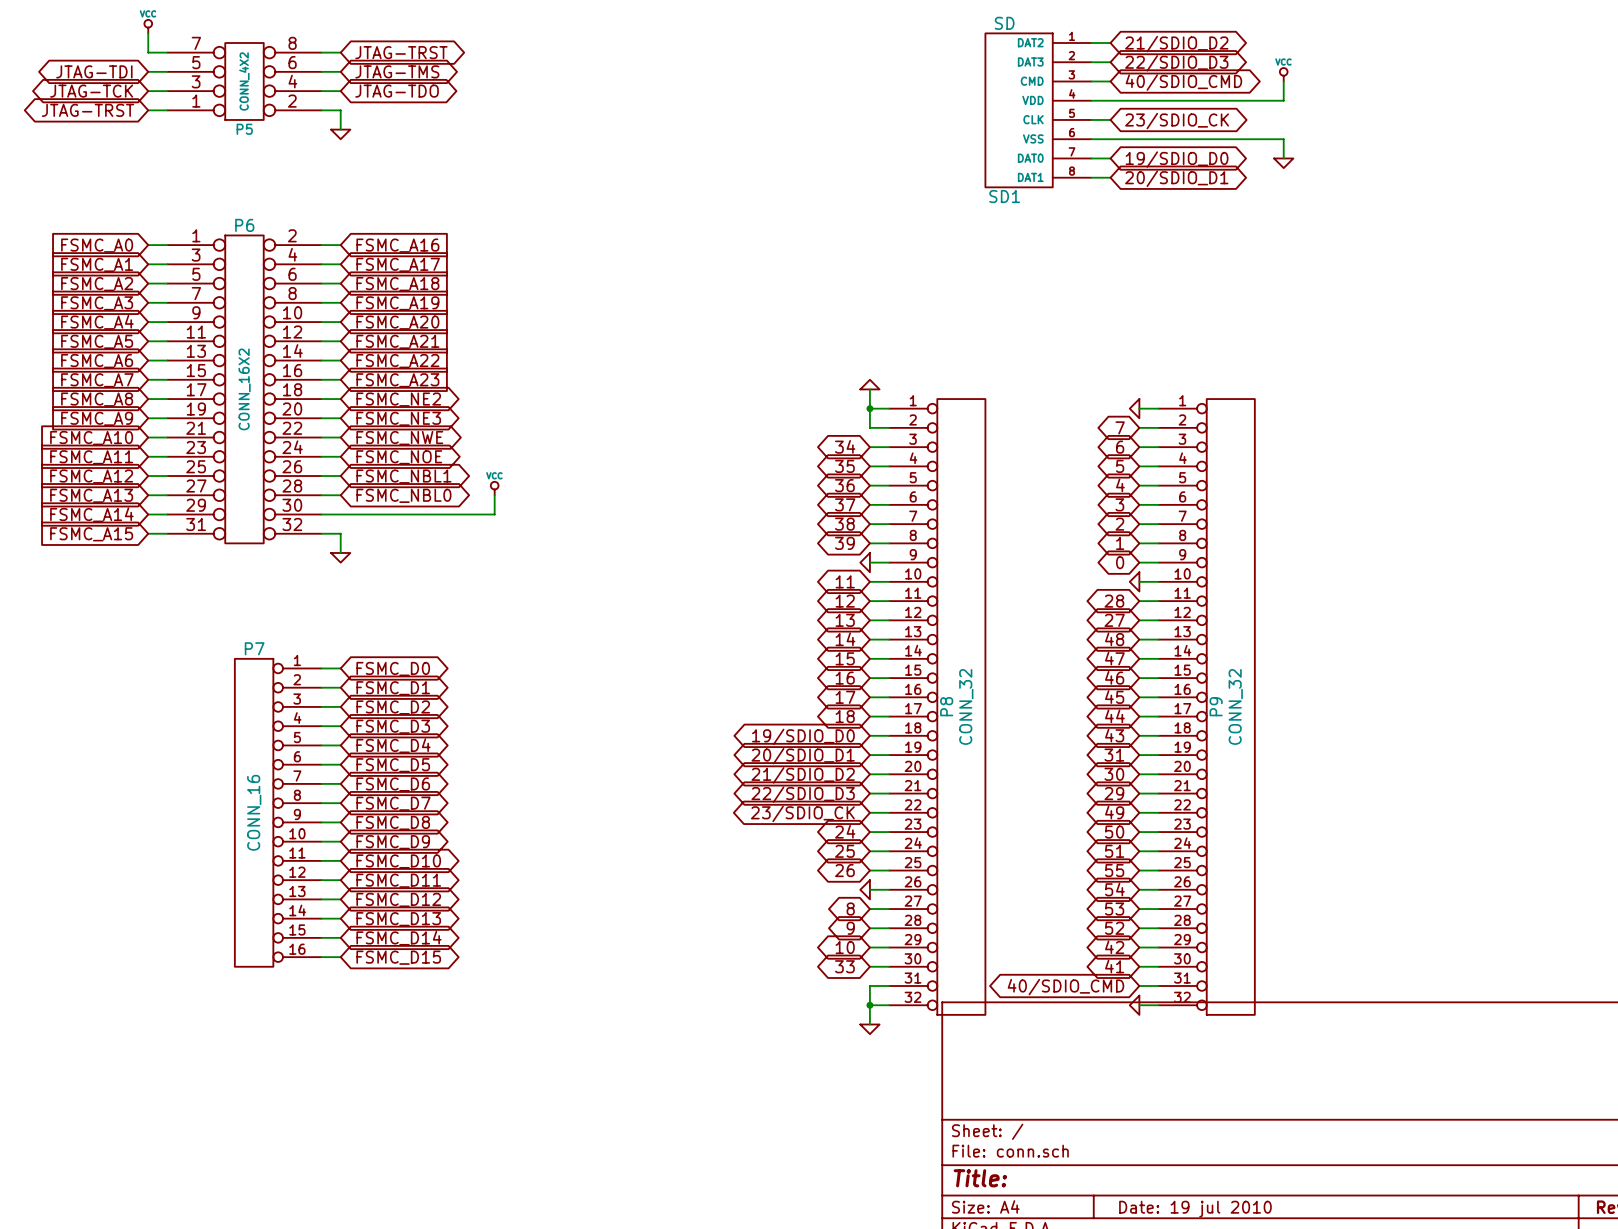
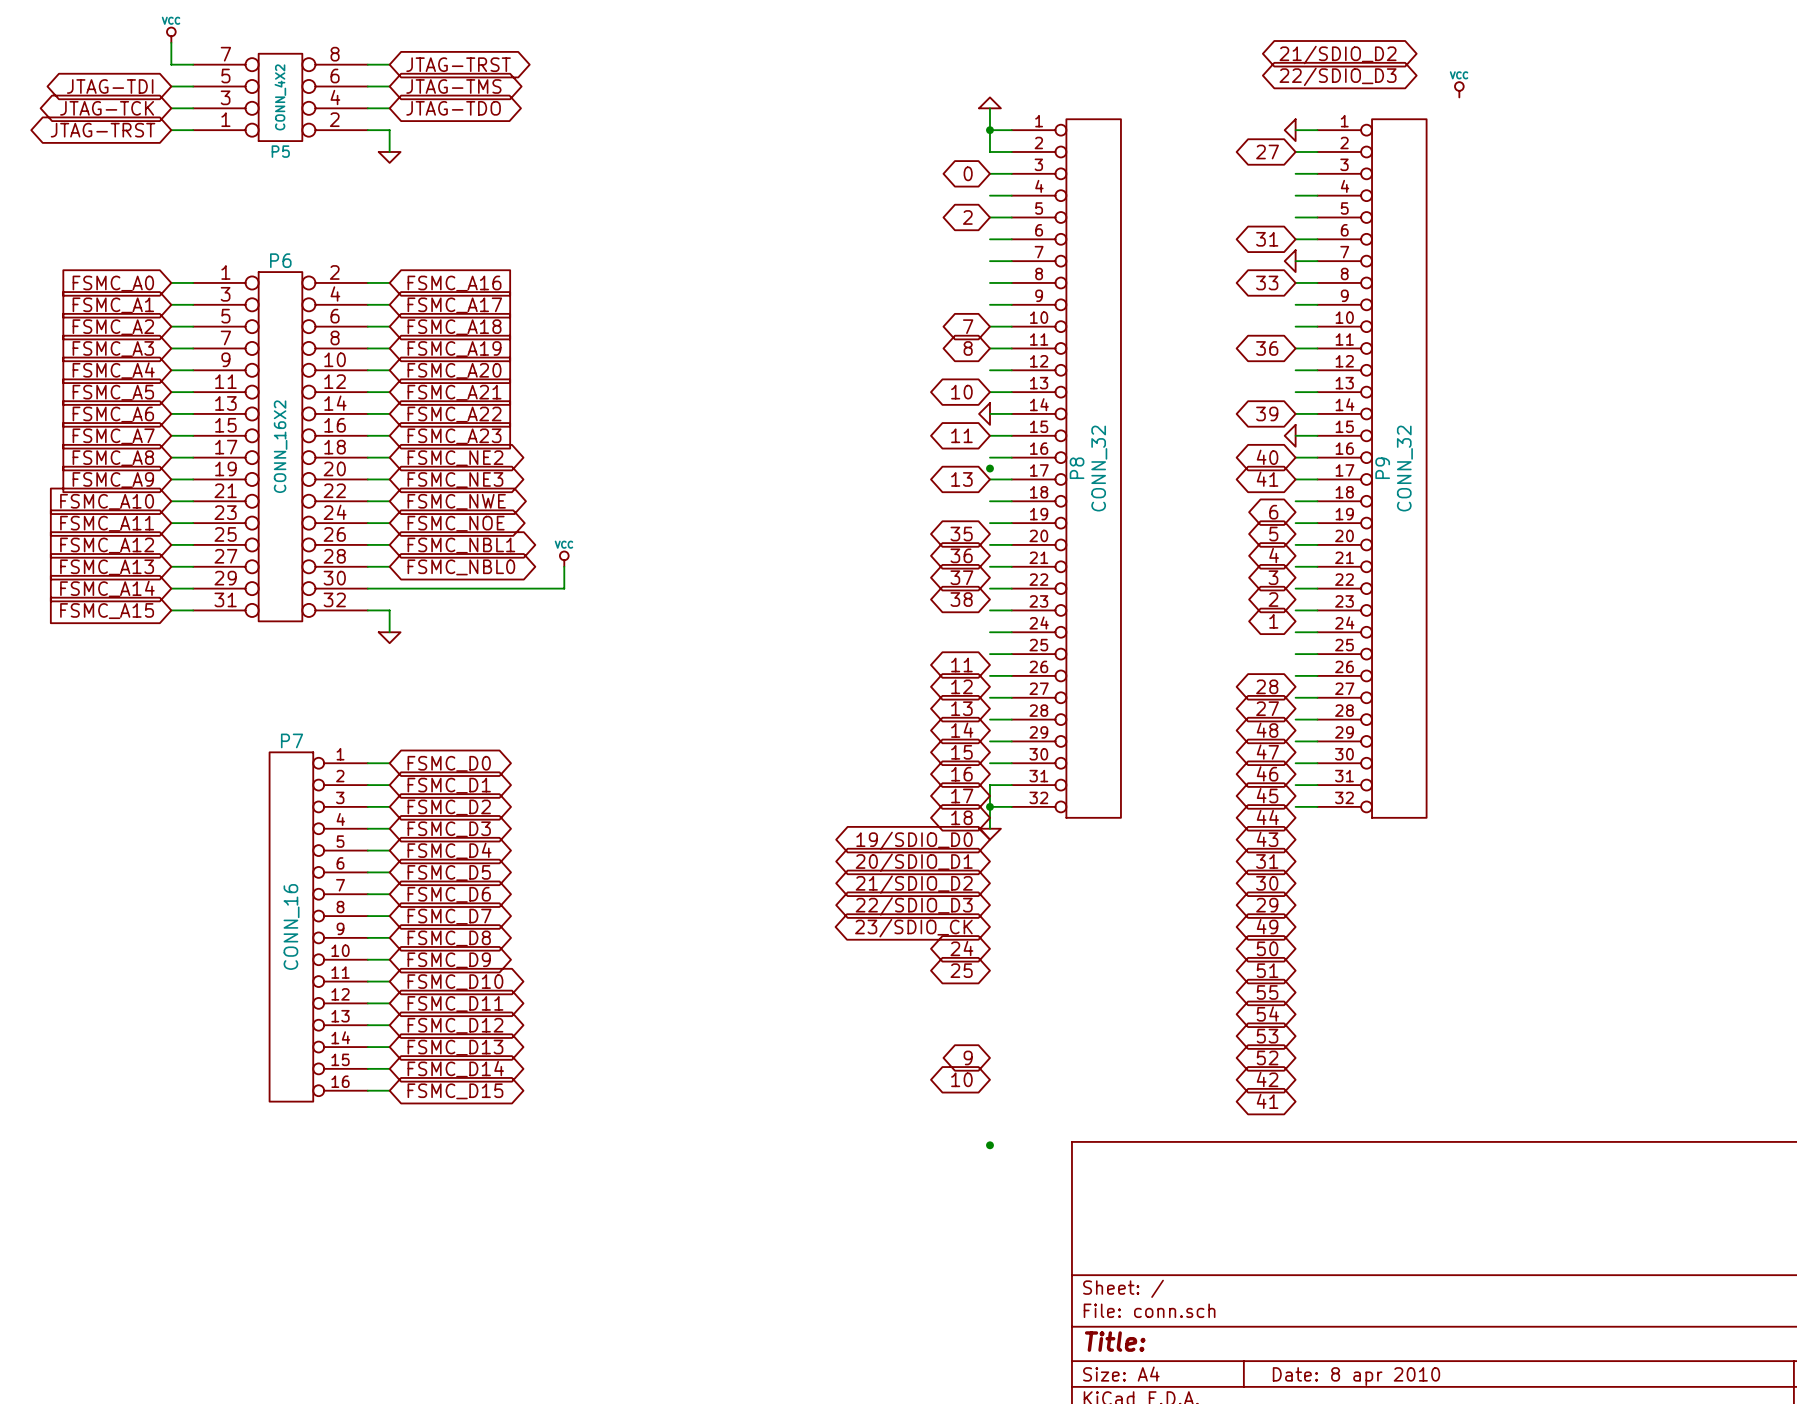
wire: (1091, 43) (1110, 43) -> (1295, 130) (1317, 130)
wire: (1091, 62) (1110, 62) -> (1295, 151) (1317, 151)
wire: (1091, 81) (1110, 81) -> (1295, 173) (1317, 173)
wire: (1283, 81) (1283, 100) (1091, 100) -> none
global label: 40/SDIO_CMD (1183, 82) -> none
power symbol: none -> (989, 102)
wire: none -> (989, 108) (989, 151) (1011, 151)
wire: none -> (989, 130) (1011, 130)
junction: none -> (989, 130)
SD1: SD (1038, 110) -> none
power symbol: none -> (1290, 130)
wire: (1091, 119) (1110, 119) -> (1295, 217) (1317, 217)
global label: 23/SDIO_CK (1177, 121) -> none
global label: none -> 27 (1267, 151)
wire: (1091, 139) (1283, 139) (1283, 158) -> none
global label: none -> 0 (968, 173)
wire: none -> (989, 173) (1011, 173)
wire: (1091, 158) (1110, 158) -> (1295, 239) (1317, 239)
global label: 19/SDIO_D0 (1177, 159) -> none
power symbol: (1283, 163) -> none
wire: none -> (989, 195) (1011, 195)
wire: (1091, 177) (1110, 177) -> (1295, 195) (1317, 195)
global label: 20/SDIO_D1 (1176, 178) -> none
global label: none -> 2 (967, 217)
wire: none -> (989, 217) (1011, 217)
wire: none -> (989, 239) (1011, 239)
global label: none -> 31 (1267, 239)
power symbol: none -> (1290, 261)
wire: none -> (989, 282) (1011, 282)
global label: none -> 33 (1267, 282)
global label: none -> 7 (968, 326)
global label: none -> 8 (968, 348)
global label: none -> 36 (1267, 348)
global label: none -> 10 (961, 392)
global label: none -> 39 (1267, 413)
global label: none -> 11 (961, 435)
power symbol rotation: 0° (869, 384) -> 90° counterclockwise (984, 413)
power symbol position: (869, 384) -> (984, 413)
wire: (869, 389) (869, 427) (889, 427) -> none
global label: none -> 40 (1267, 457)
wire: (869, 408) (889, 408) -> (989, 261) (1011, 261)
power symbol position: (1134, 408) -> (1290, 435)
wire: (1139, 408) (1158, 408) -> (1295, 261) (1317, 261)
global label: none -> 13 (961, 479)
global label: none -> 41 (1267, 479)
global label: 7 (1120, 427) -> none
wire: (1139, 427) (1158, 427) -> (1295, 282) (1317, 282)
global label: 34 (845, 446) -> none
wire: (869, 447) (889, 447) -> (989, 304) (1011, 304)
wire: (1139, 447) (1158, 447) -> (1295, 304) (1317, 304)
wire: (869, 466) (889, 466) -> (989, 326) (1011, 326)
wire: (1139, 466) (1158, 466) -> (1295, 326) (1317, 326)
wire: (869, 485) (889, 485) -> (989, 348) (1011, 348)
wire: (1139, 485) (1158, 485) -> (1295, 348) (1317, 348)
wire: (869, 504) (889, 504) -> (989, 370) (1011, 370)
wire: (1139, 504) (1158, 504) -> (1295, 370) (1317, 370)
wire: (869, 524) (889, 524) -> (989, 392) (1011, 392)
wire: (1139, 524) (1158, 524) -> (1295, 392) (1317, 392)
global label: 39 (844, 543) -> none
wire: (869, 543) (889, 543) -> (989, 413) (1011, 413)
wire: (1139, 543) (1158, 543) -> (1295, 413) (1317, 413)
power symbol: (865, 562) -> none
wire: (869, 562) (889, 562) -> (989, 435) (1011, 435)
global label: 0 (1120, 562) -> none
wire: (1139, 562) (1158, 562) -> (1295, 435) (1317, 435)
wire: (869, 581) (889, 581) -> (989, 457) (1011, 457)
power symbol: (1134, 581) -> none
wire: (1139, 581) (1158, 581) -> (1295, 457) (1317, 457)
wire: (869, 601) (889, 601) -> (989, 479) (1011, 479)
wire: (1139, 601) (1158, 601) -> (1295, 479) (1317, 479)
wire: (869, 620) (889, 620) -> (989, 501) (1011, 501)
wire: (1139, 620) (1158, 620) -> (1295, 501) (1317, 501)
wire: (869, 639) (889, 639) -> (989, 523) (1011, 523)
wire: (1139, 639) (1158, 639) -> (1295, 523) (1317, 523)
wire: (869, 658) (889, 658) -> (989, 544) (1011, 544)
wire: (1139, 658) (1158, 658) -> (1295, 544) (1317, 544)
wire: (869, 678) (889, 678) -> (989, 566) (1011, 566)
wire: (1139, 678) (1158, 678) -> (1295, 566) (1317, 566)
wire: none -> (1011, 785) (989, 785) (989, 828)
wire: (869, 697) (889, 697) -> (989, 588) (1011, 588)
wire: (1139, 697) (1158, 697) -> (1295, 588) (1317, 588)
junction: none -> (989, 806)
P8 position: (937, 706) -> (1066, 468)
P9 position: (1206, 706) -> (1372, 468)
wire: (869, 716) (889, 716) -> (989, 610) (1011, 610)
wire: (1139, 716) (1158, 716) -> (1295, 610) (1317, 610)
power symbol: none -> (989, 834)
wire: (869, 735) (889, 735) -> (989, 632) (1011, 632)
wire: (1139, 735) (1158, 735) -> (1295, 632) (1317, 632)
wire: (869, 755) (889, 755) -> (989, 654) (1011, 654)
wire: (1139, 755) (1158, 755) -> (1295, 654) (1317, 654)
wire: (869, 774) (889, 774) -> (989, 675) (1011, 675)
wire: (1139, 774) (1158, 774) -> (1295, 675) (1317, 675)
wire: (869, 793) (889, 793) -> (989, 697) (1011, 697)
wire: (1139, 793) (1158, 793) -> (1295, 697) (1317, 697)
wire: (869, 812) (889, 812) -> (989, 719) (1011, 719)
wire: (1139, 812) (1158, 812) -> (1295, 719) (1317, 719)
wire: (869, 832) (889, 832) -> (989, 741) (1011, 741)
wire: (1139, 832) (1158, 832) -> (1295, 741) (1317, 741)
wire: (869, 851) (889, 851) -> (989, 763) (1011, 763)
wire: (1139, 851) (1158, 851) -> (1295, 763) (1317, 763)
global label: 26 (844, 870) -> none
wire: (869, 870) (889, 870) -> none
wire: (1139, 870) (1158, 870) -> (1295, 785) (1317, 785)
power symbol: (865, 889) -> none
wire: (869, 889) (889, 889) -> (989, 806) (1011, 806)
wire: (1139, 889) (1158, 889) -> (1295, 806) (1317, 806)
global label: 8 (850, 909) -> none
wire: (869, 909) (889, 909) -> none
wire: (1139, 909) (1158, 909) -> none
wire: (869, 928) (889, 928) -> none
wire: (1139, 928) (1158, 928) -> none
wire: (869, 947) (889, 947) -> none
wire: (1139, 947) (1158, 947) -> none
global label: 33 (844, 966) -> none
wire: (869, 966) (889, 966) -> none
wire: (1139, 966) (1158, 966) -> none
wire: (889, 986) (869, 986) (869, 1024) -> none
wire: (1139, 986) (1158, 986) -> none
global label: 40/SDIO_CMD (1065, 987) -> none
wire: (869, 1005) (889, 1005) -> none
power symbol: (1134, 1005) -> none
wire: (1139, 1005) (1158, 1005) -> none
power symbol: (869, 1029) -> none
title block: Date: 19 jul 2010 (1195, 1209) -> Date: 8 apr 2010 (1356, 1376)

